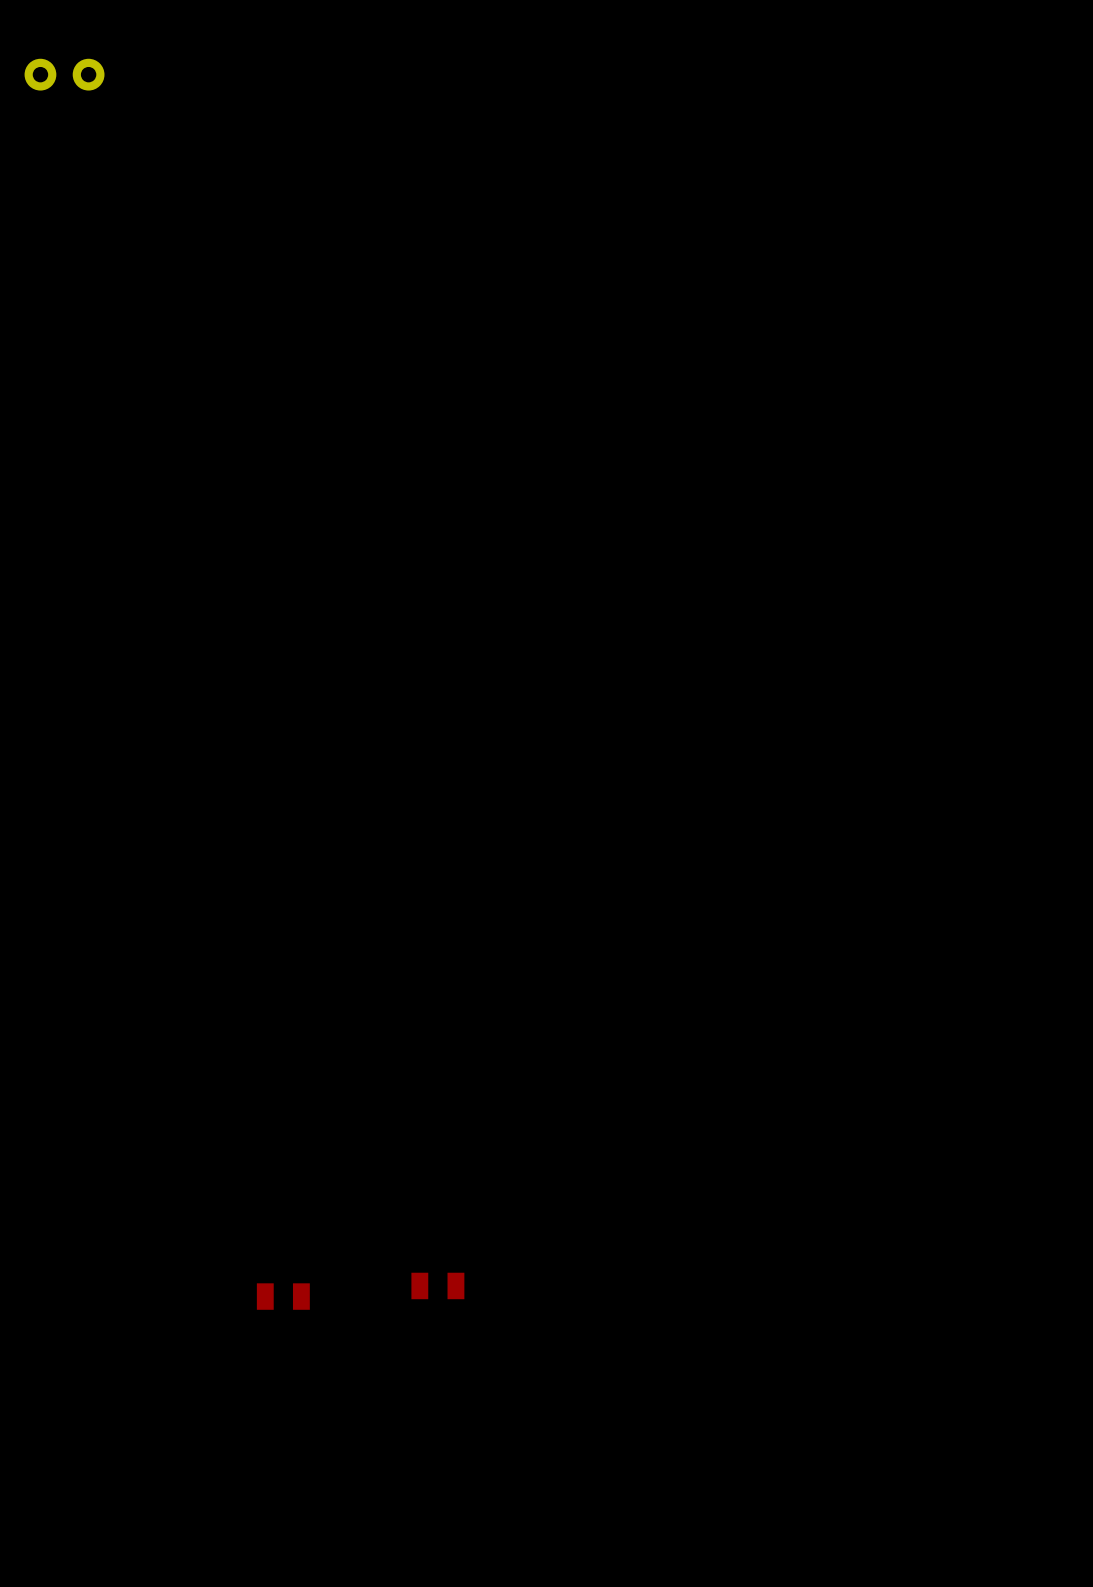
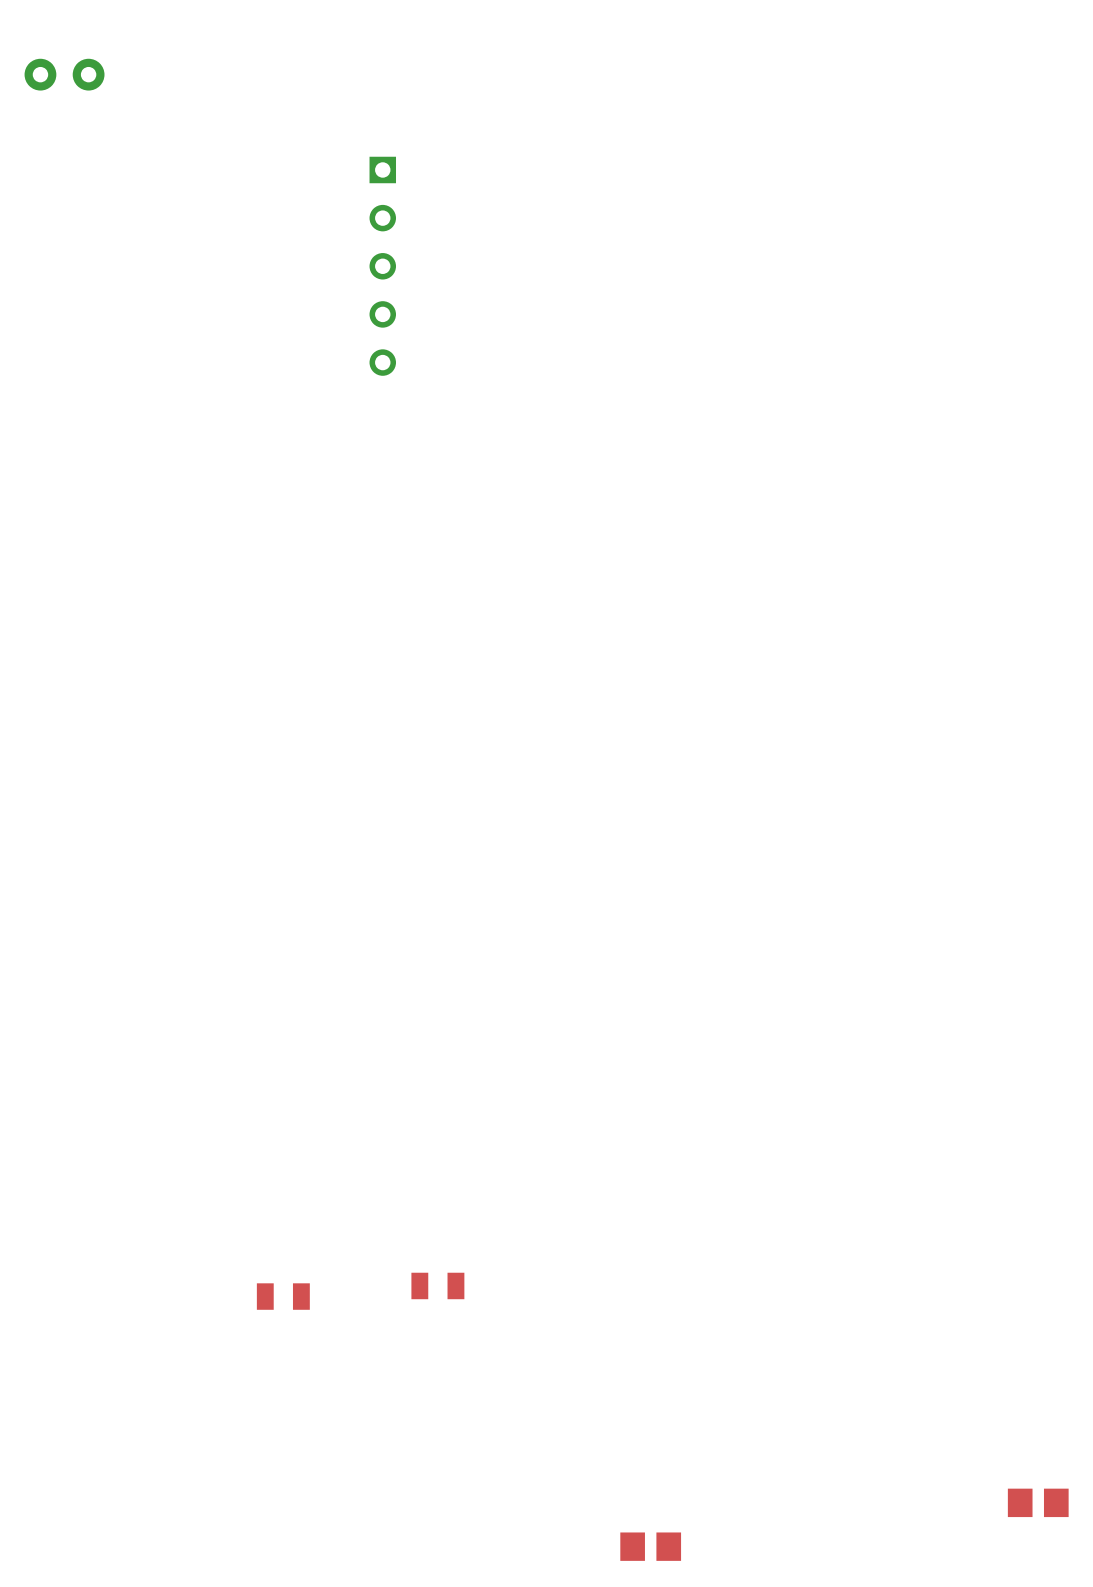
part: none -> (382, 266)
part: none -> (1038, 1502)
part: none -> (650, 1546)

